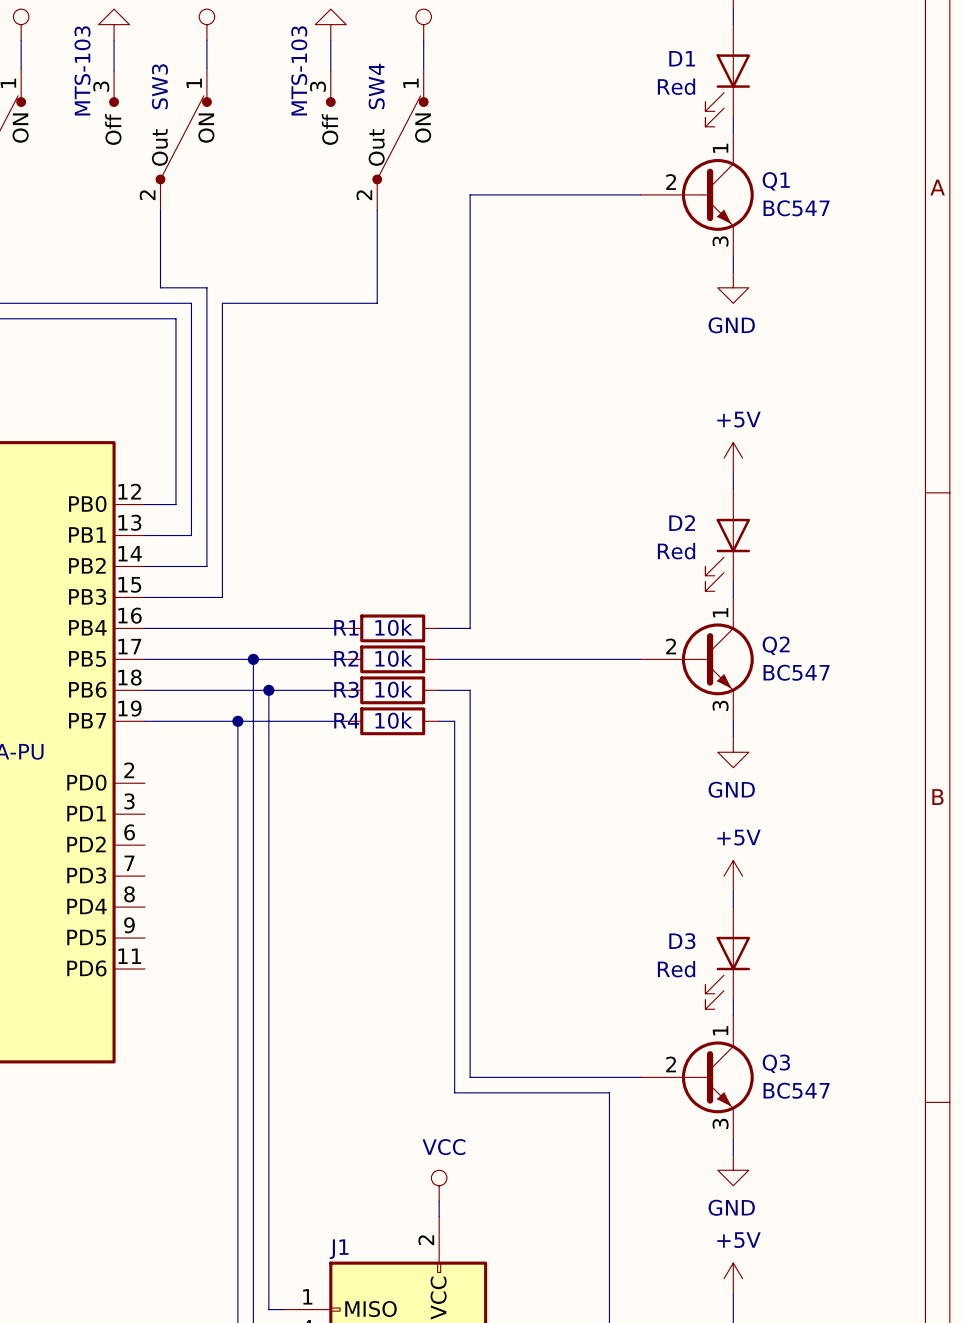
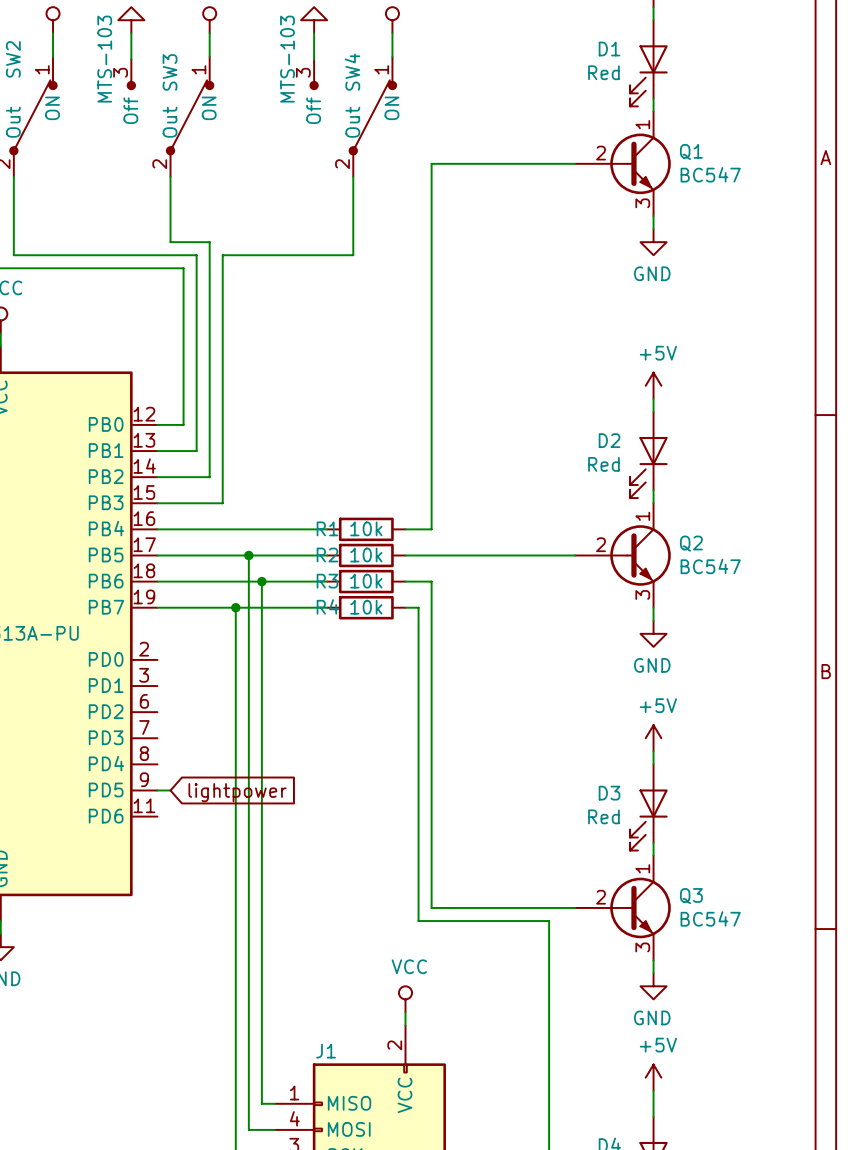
wire: none -> (157, 790) (170, 790)
global label: none -> lightpower (237, 792)

